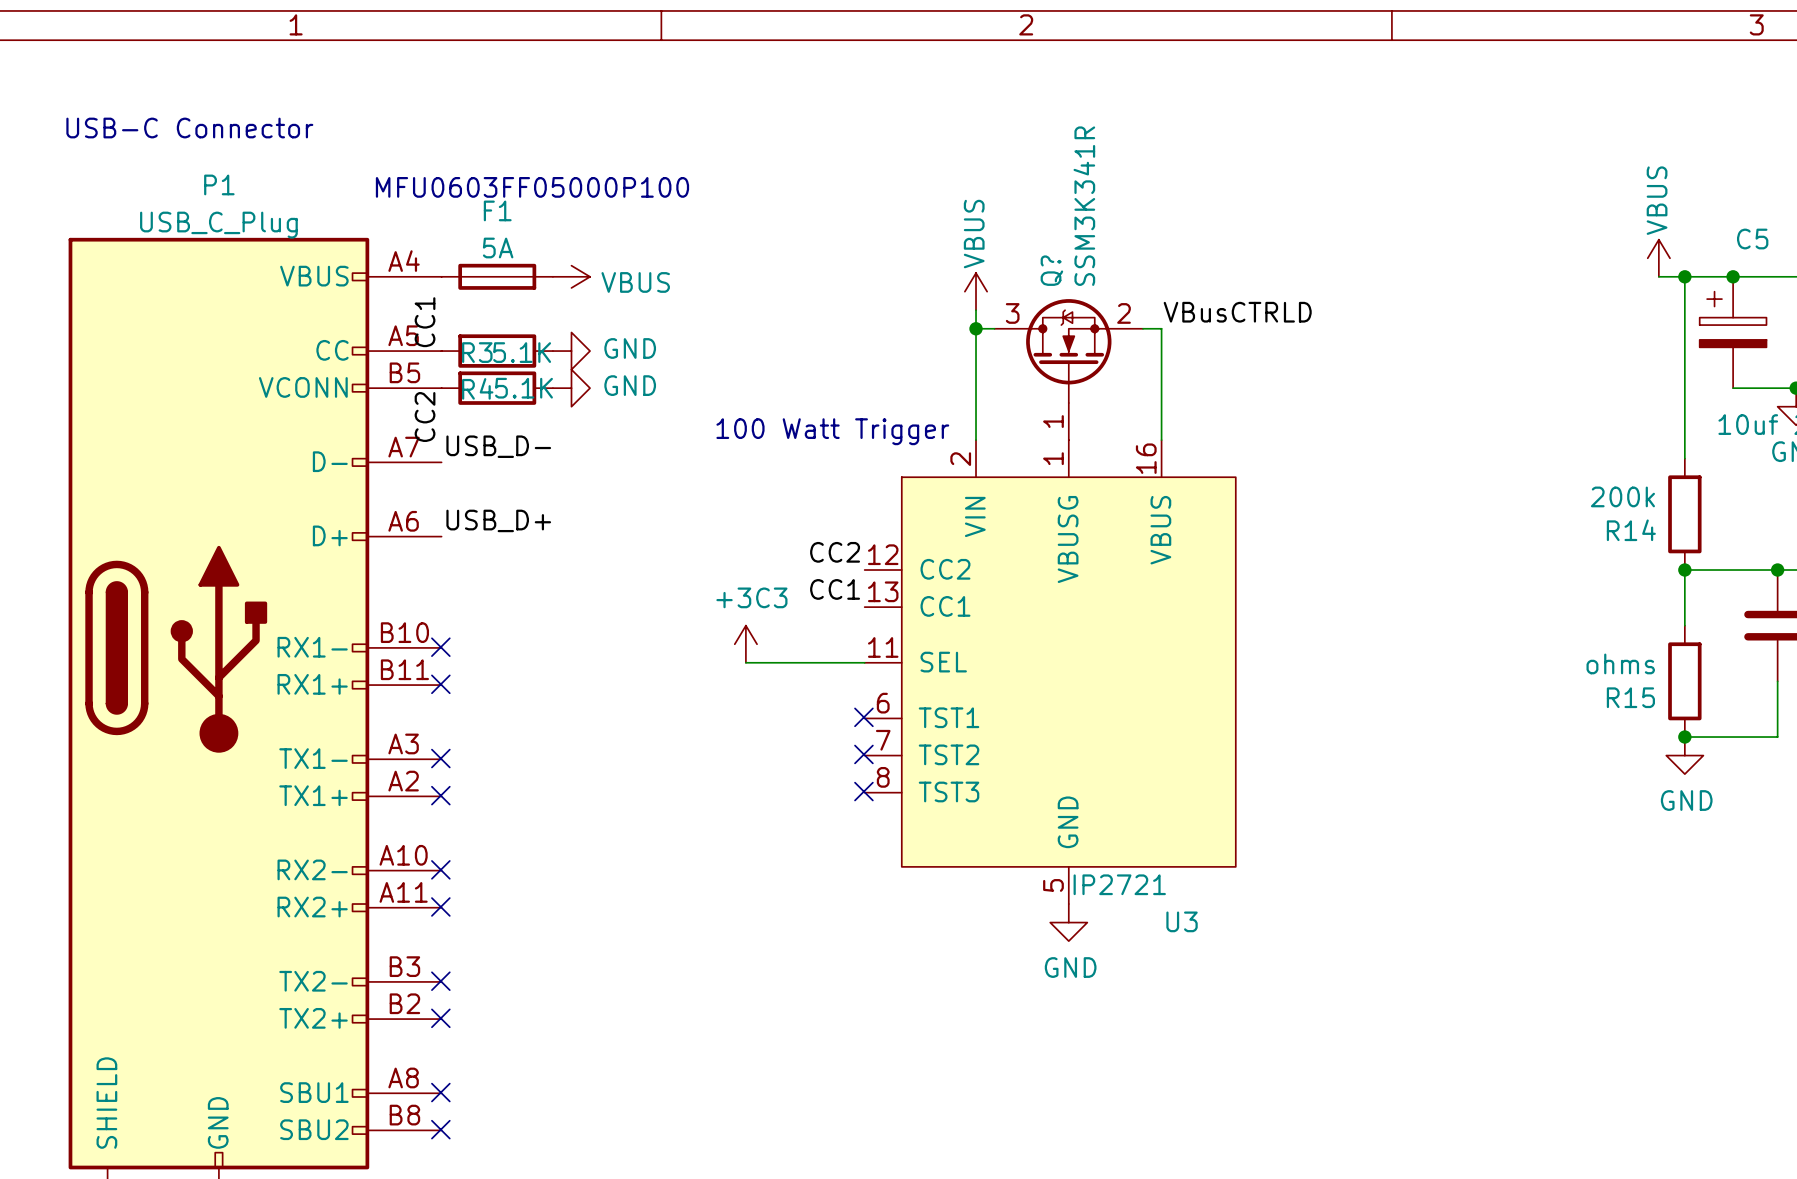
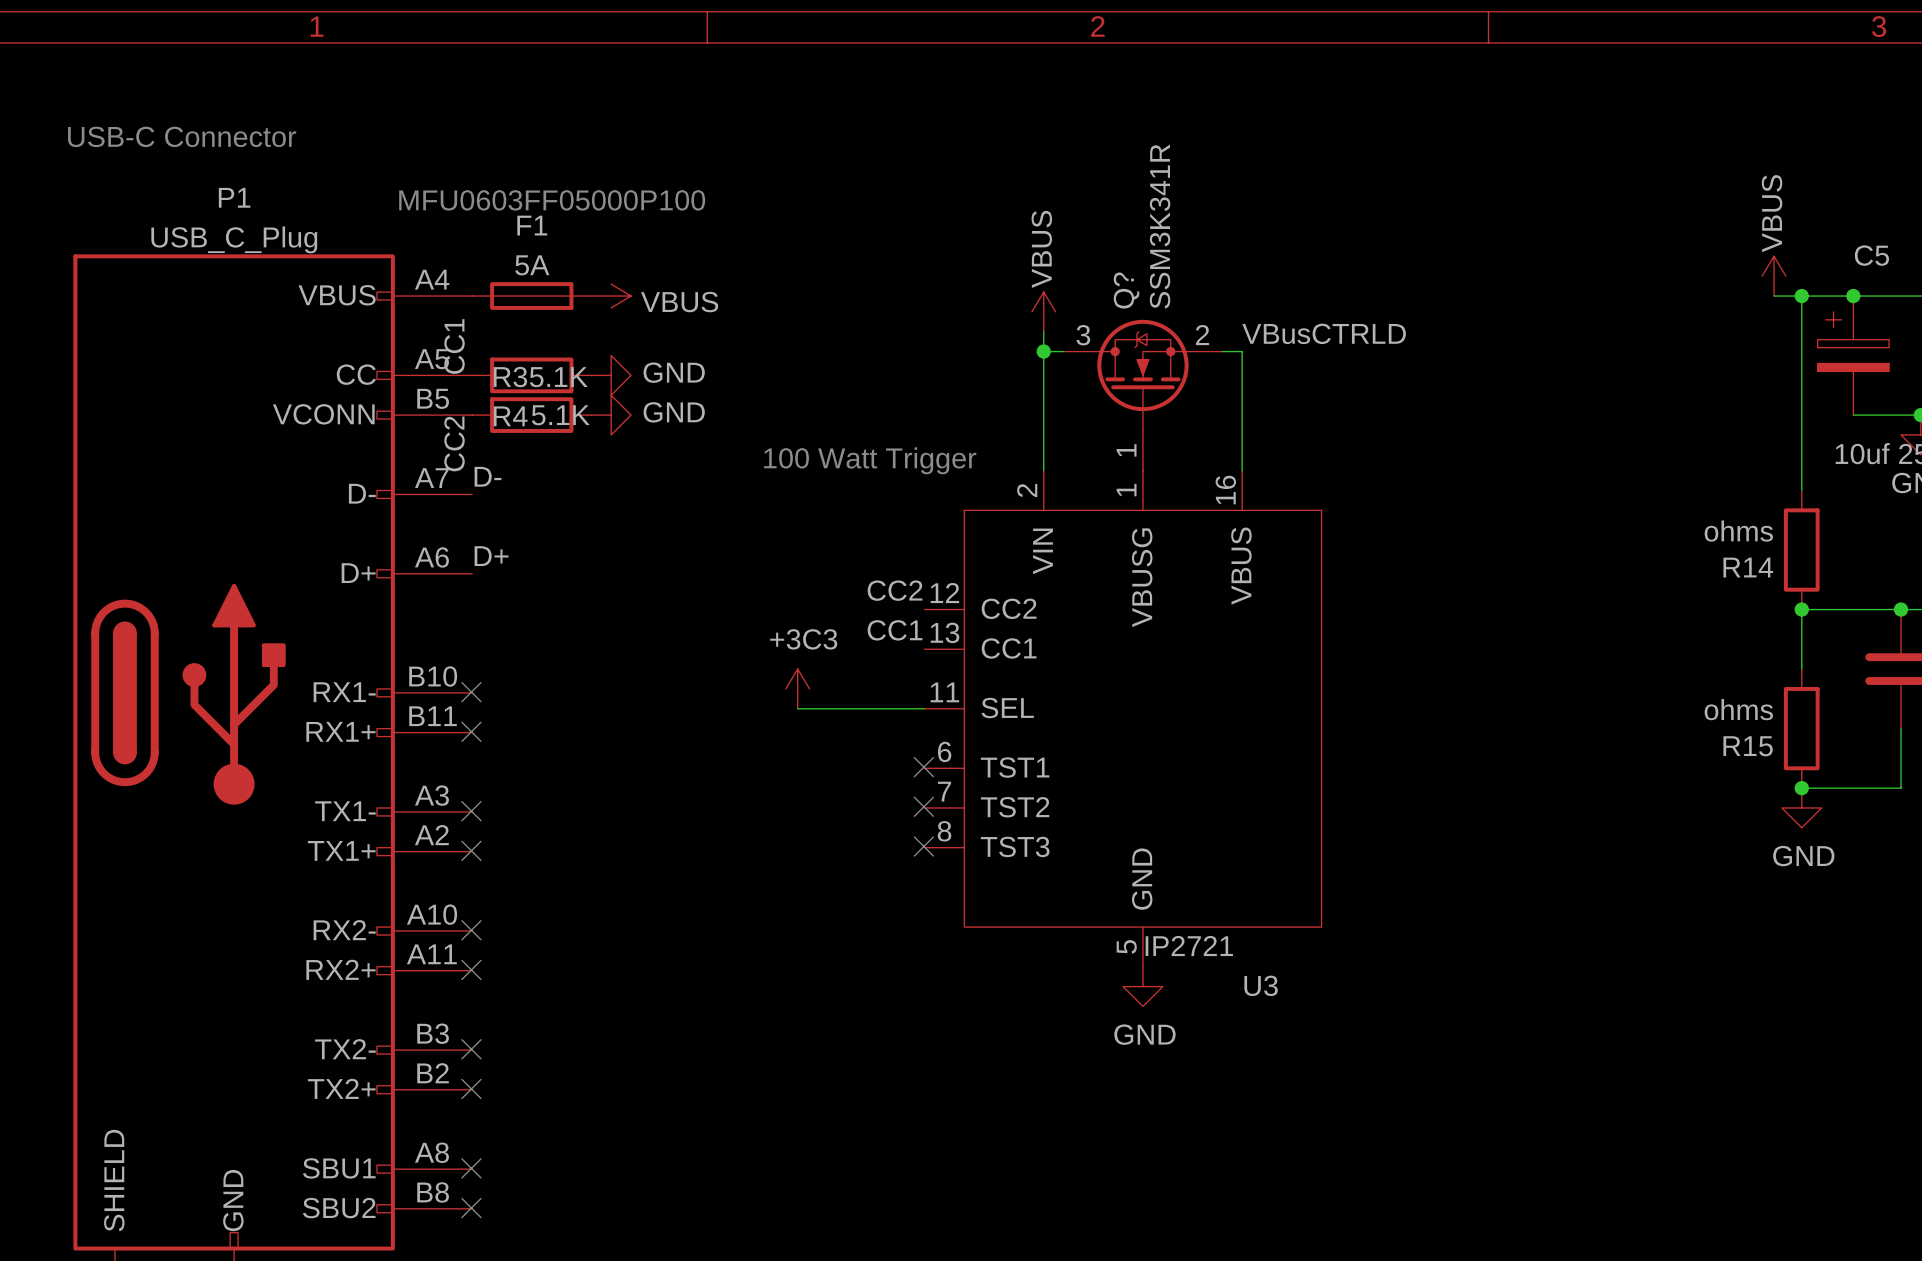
label: USB_D- (498, 446) -> D- (488, 476)
R14 value: 200k (1622, 496) -> ohms (1738, 531)
label: USB_D+ (498, 520) -> D+ (491, 556)

